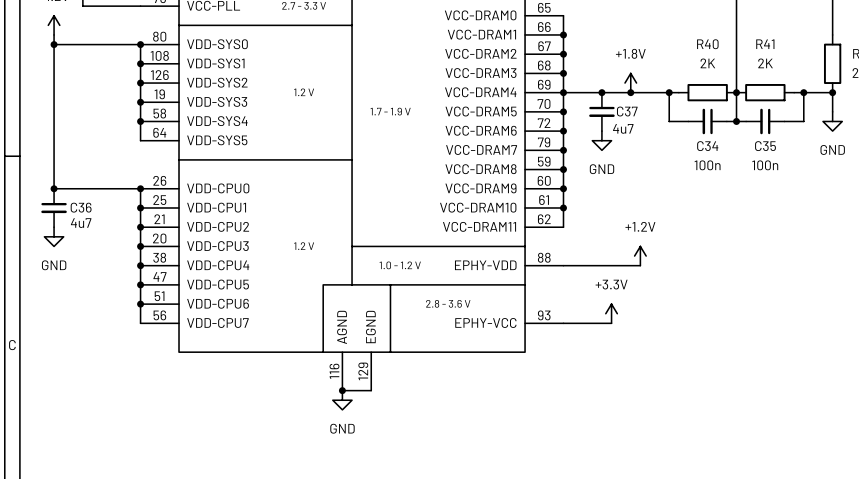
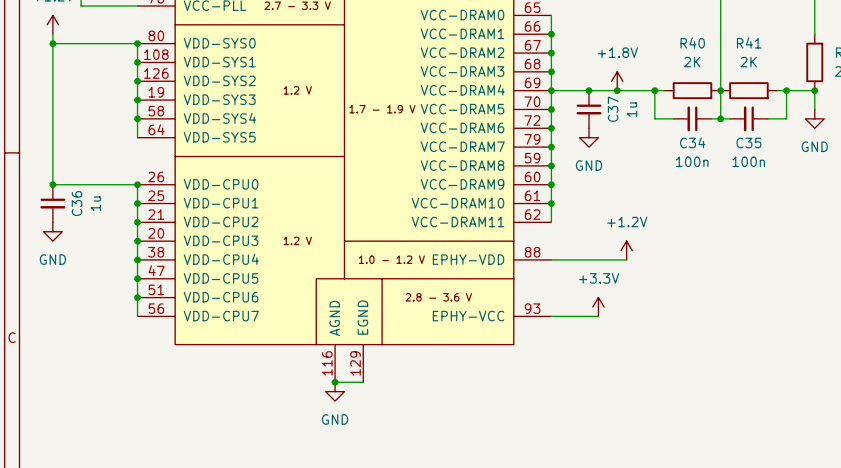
C37 name rotation: 0° (627, 111) -> 90° counterclockwise (613, 109)
C37 value: 4u7 (623, 128) -> 1u (631, 109)
C36 name rotation: 0° (81, 207) -> 90° counterclockwise (76, 203)
C36 value: 4u7 (81, 223) -> 1u (95, 203)

